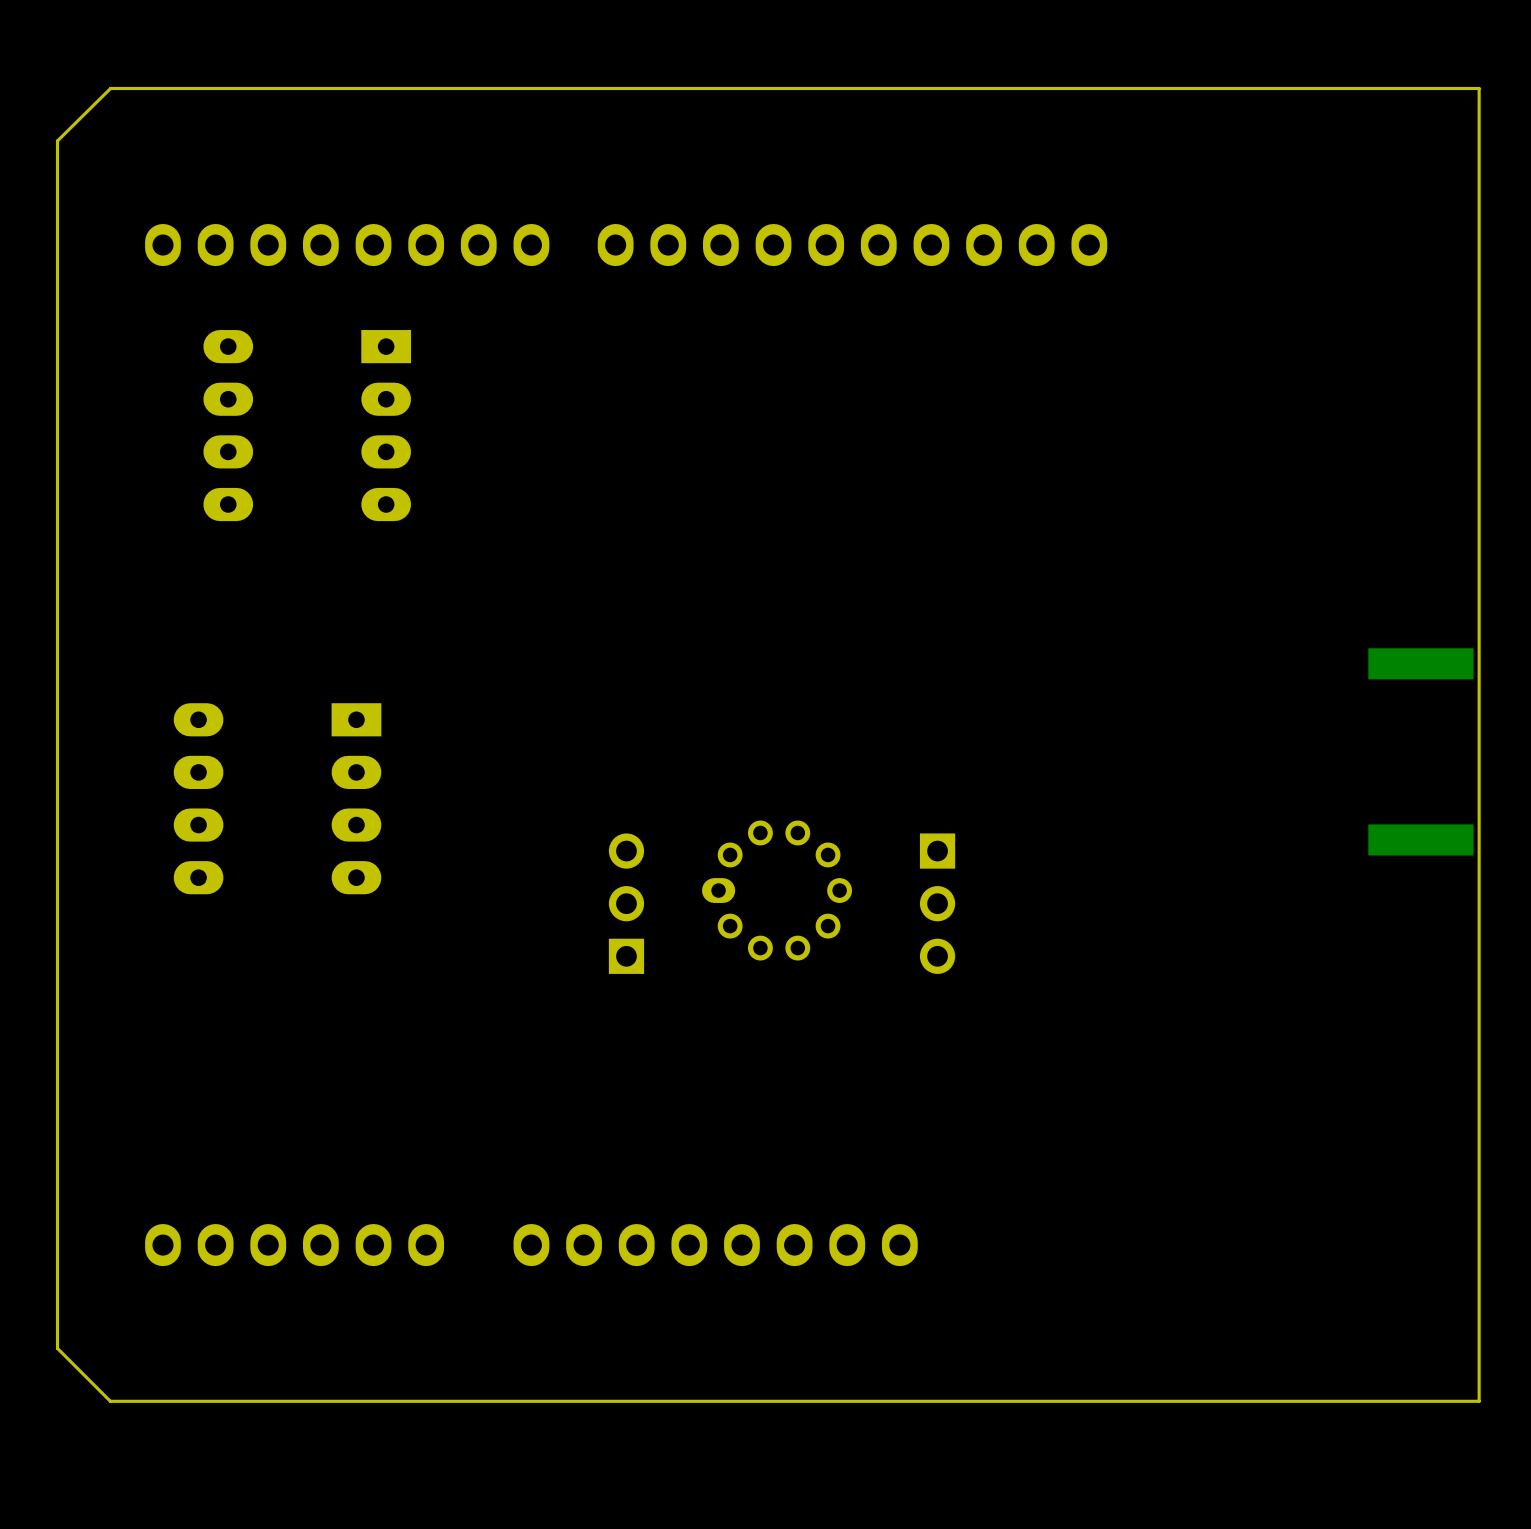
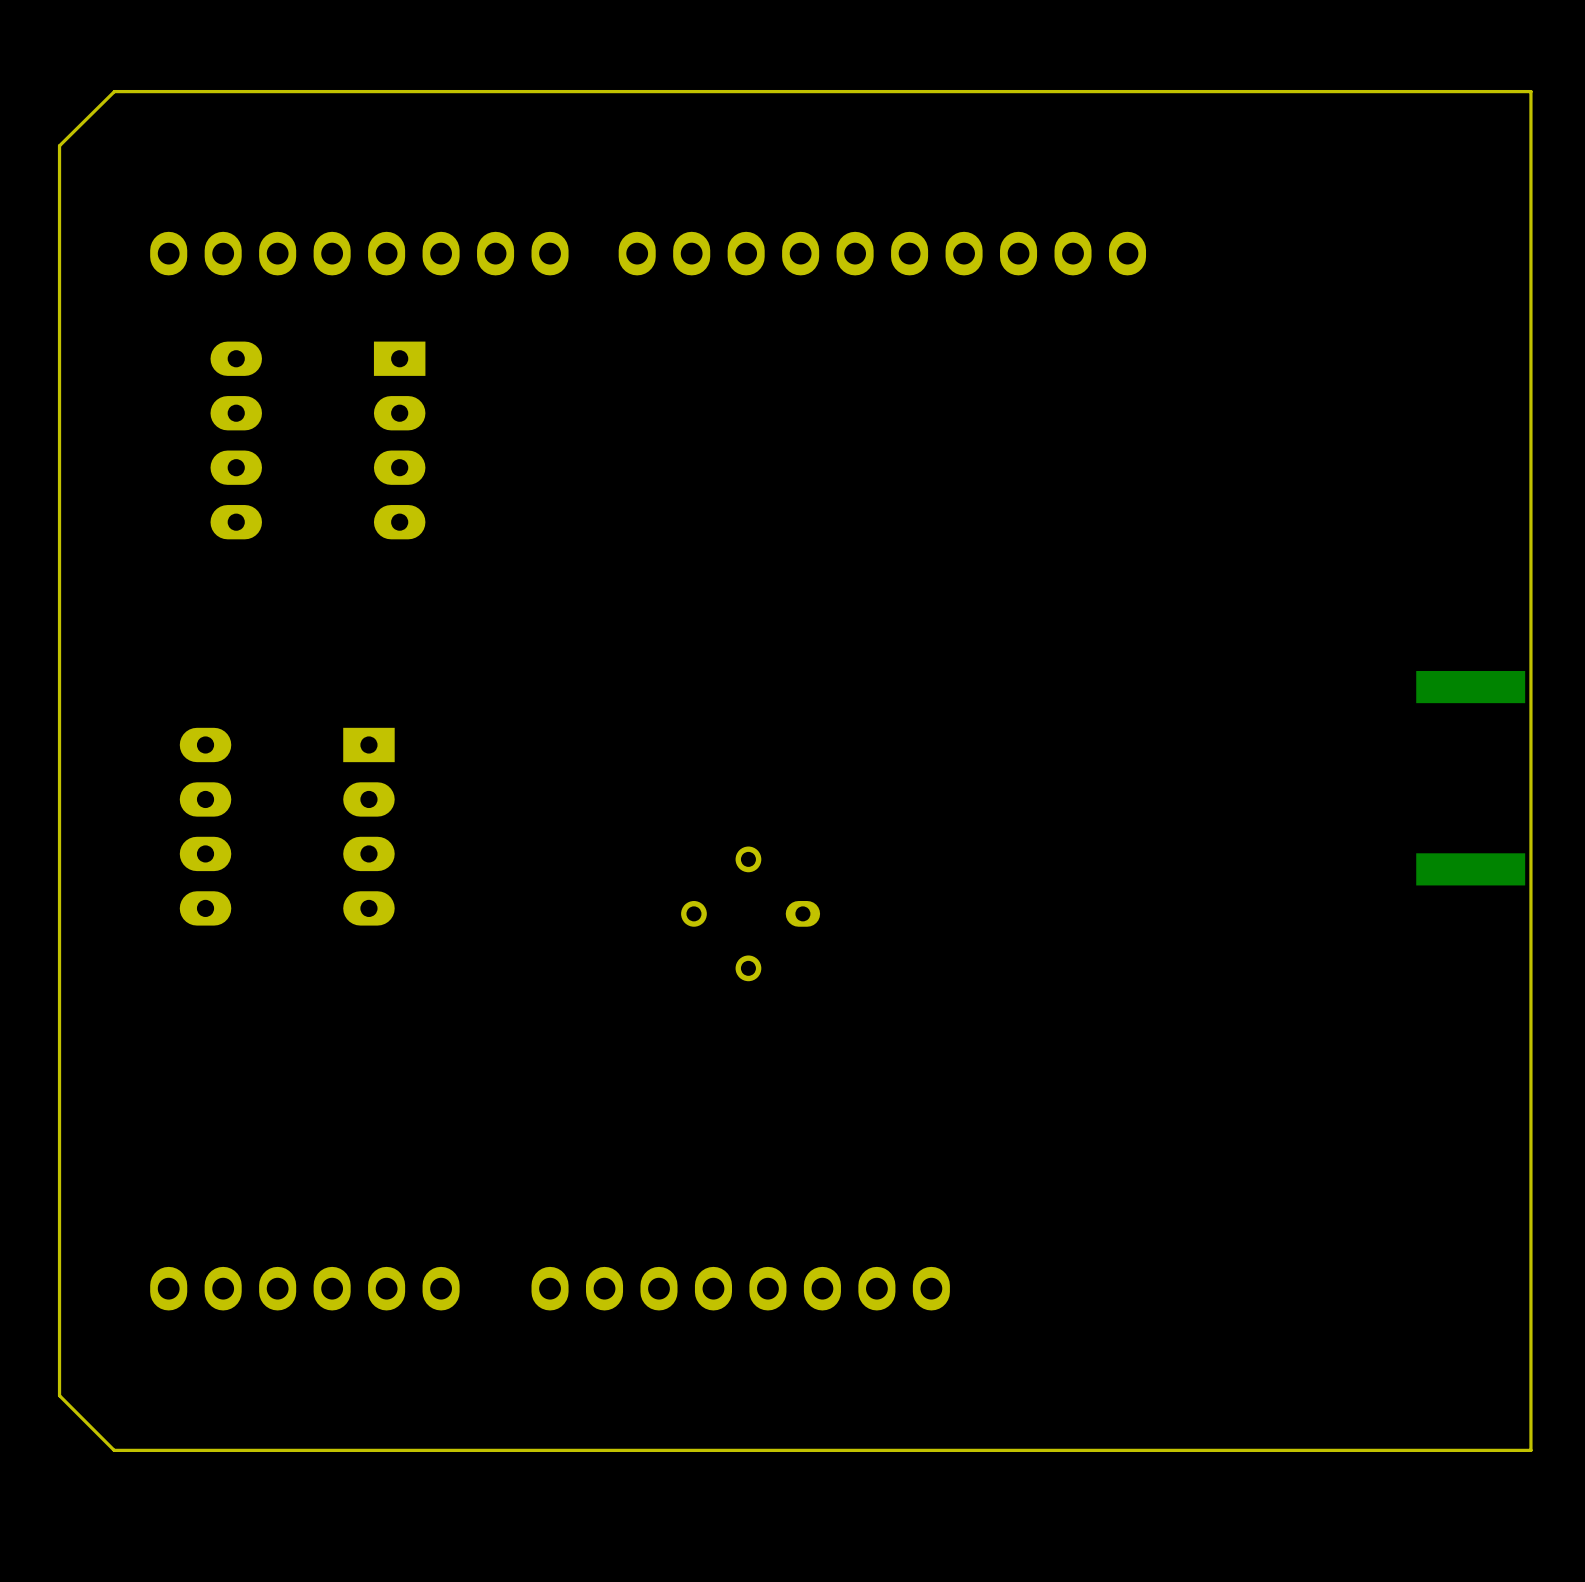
part: none -> (750, 913)
part: (777, 890) -> none
part: (626, 903) -> none
part: (937, 903) -> none

